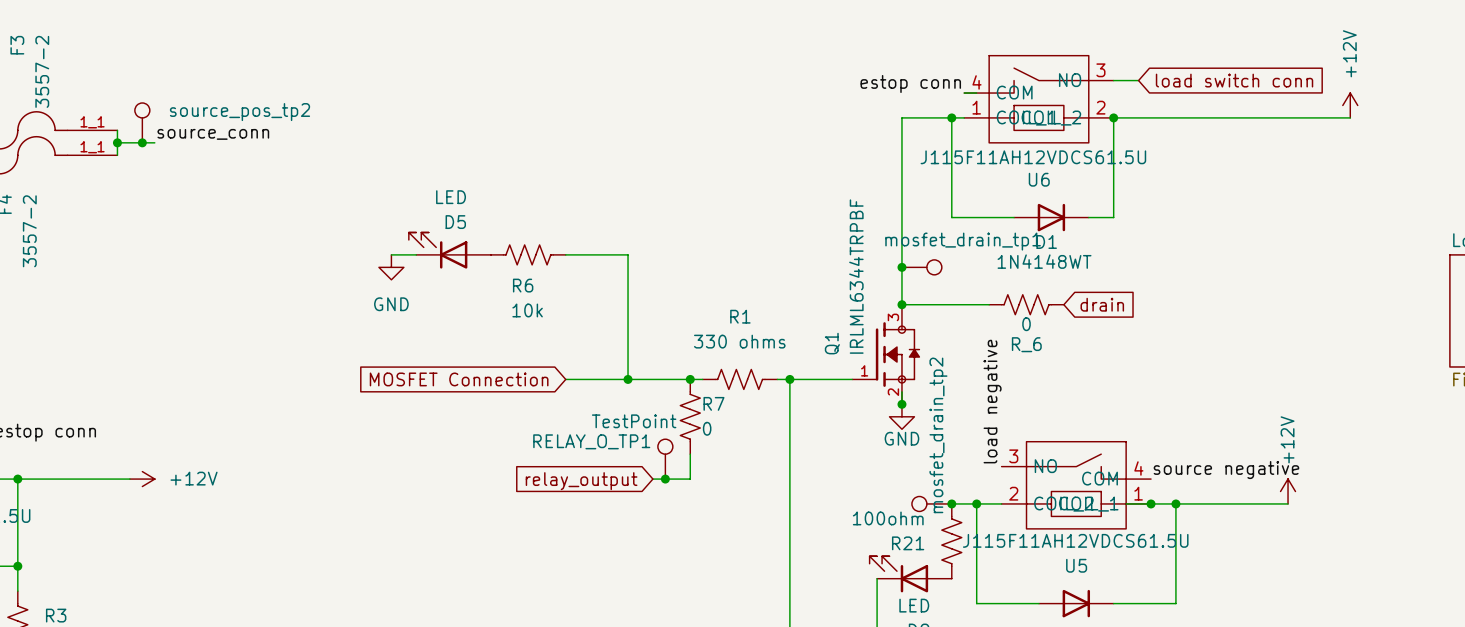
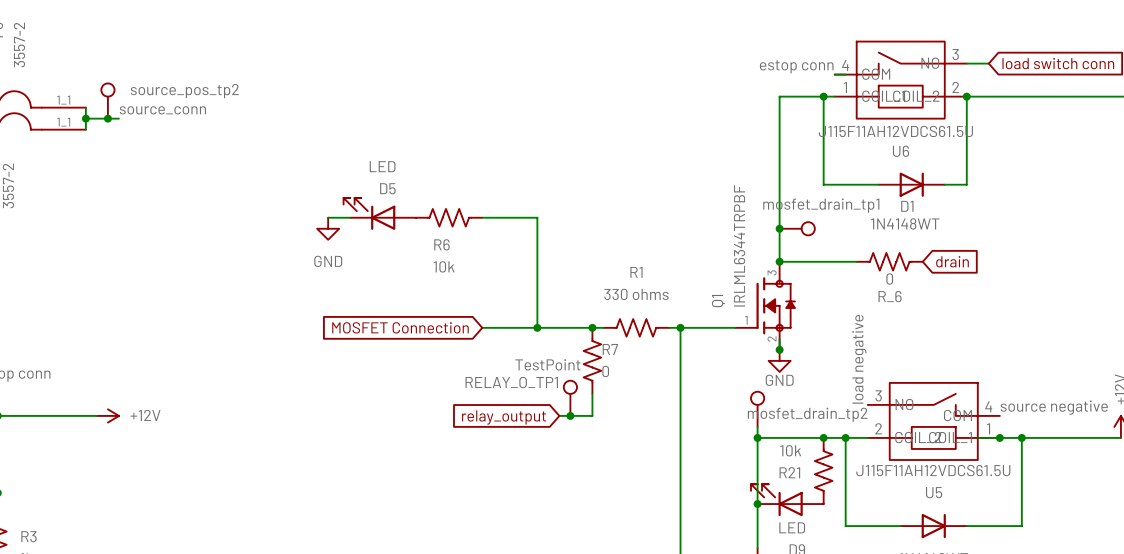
wire: none -> (757, 426) (757, 504)
wire: none -> (757, 437) (823, 437)
junction: none -> (757, 437)
mosfet_drain_tp2 rotation: 0° (919, 503) -> 90° clockwise (757, 398)
mosfet_drain_tp2 position: (931, 503) -> (757, 409)
R21 value: 100ohm (888, 518) -> 10k (790, 450)
junction: none -> (757, 504)

